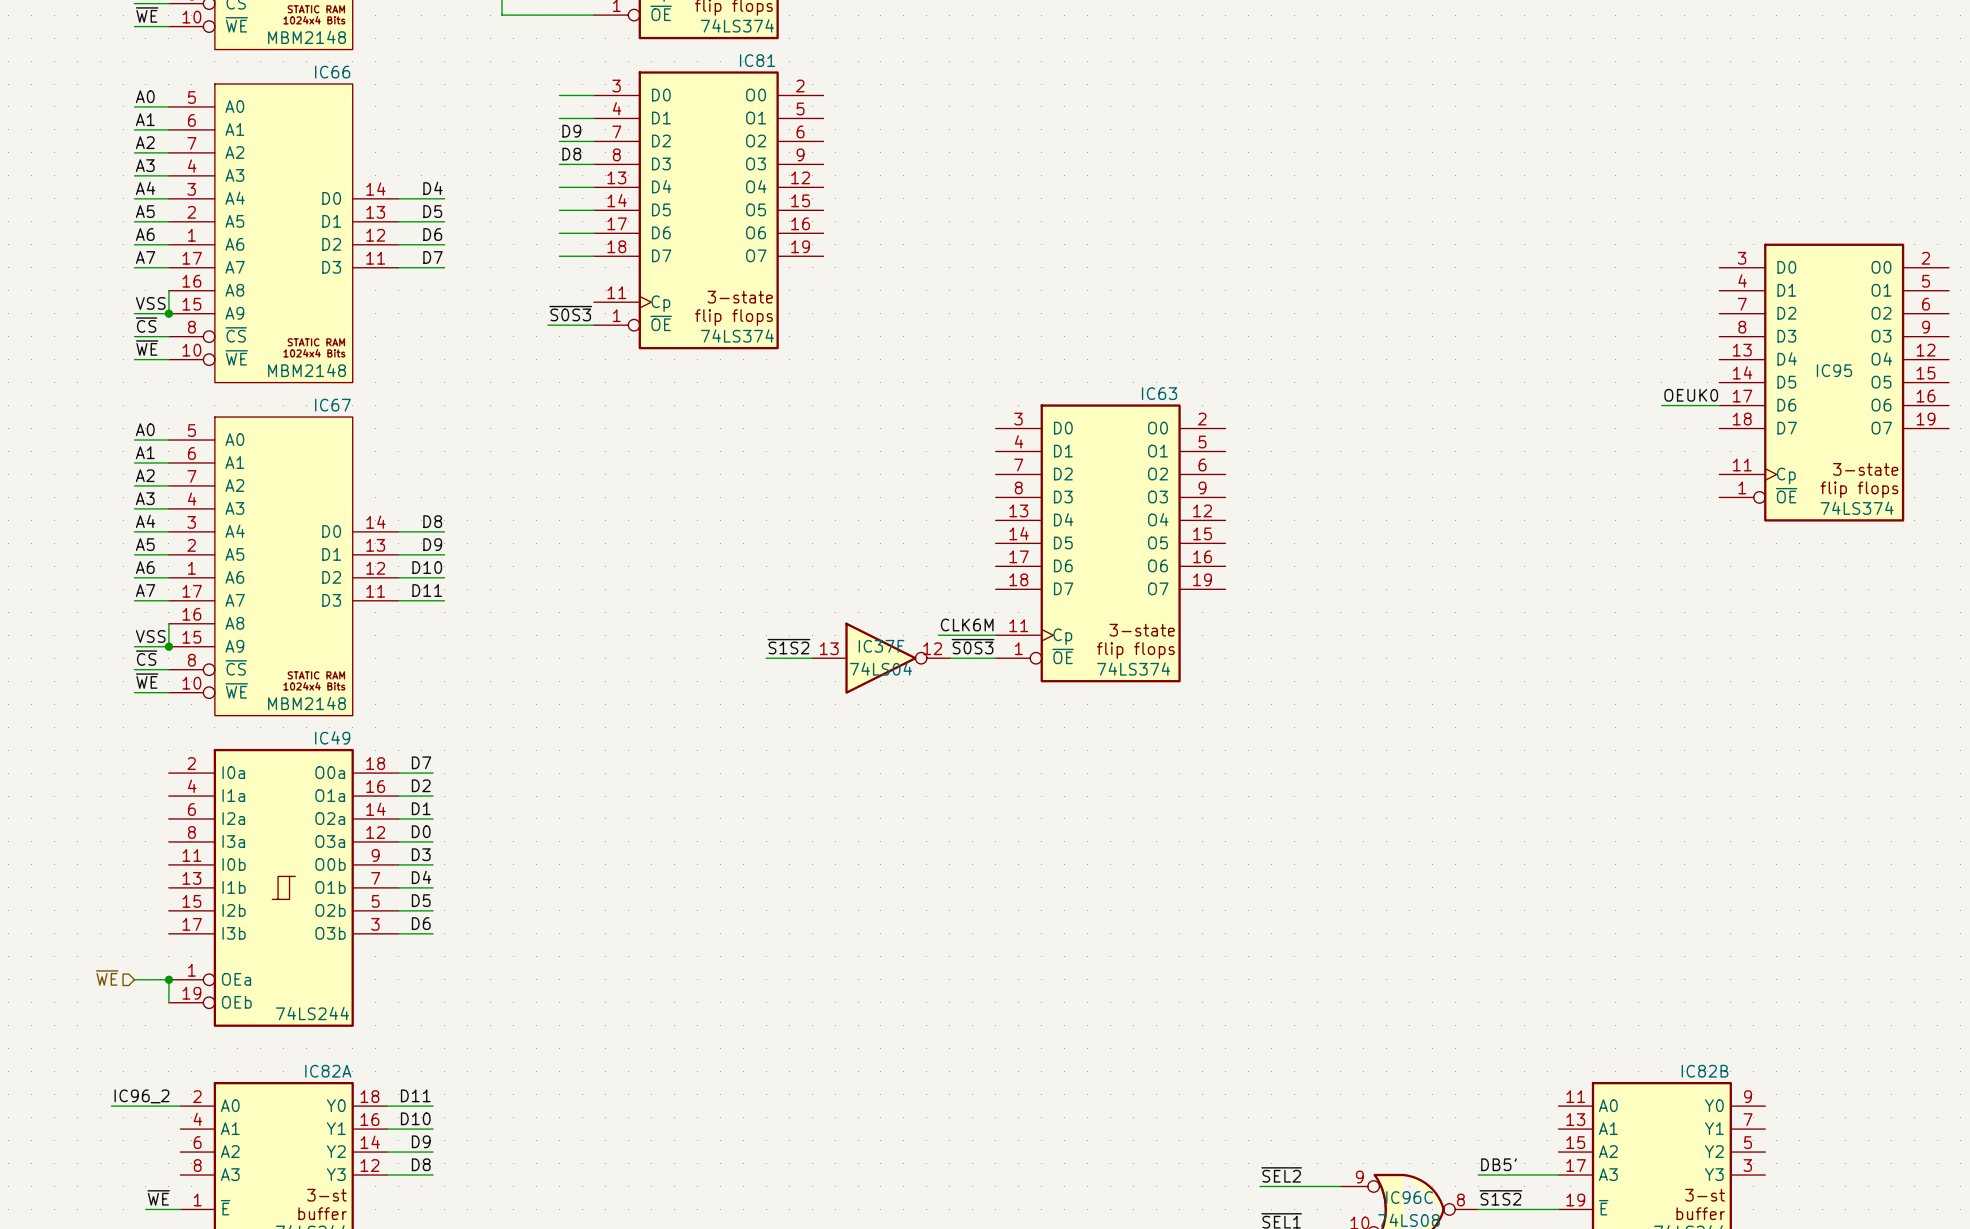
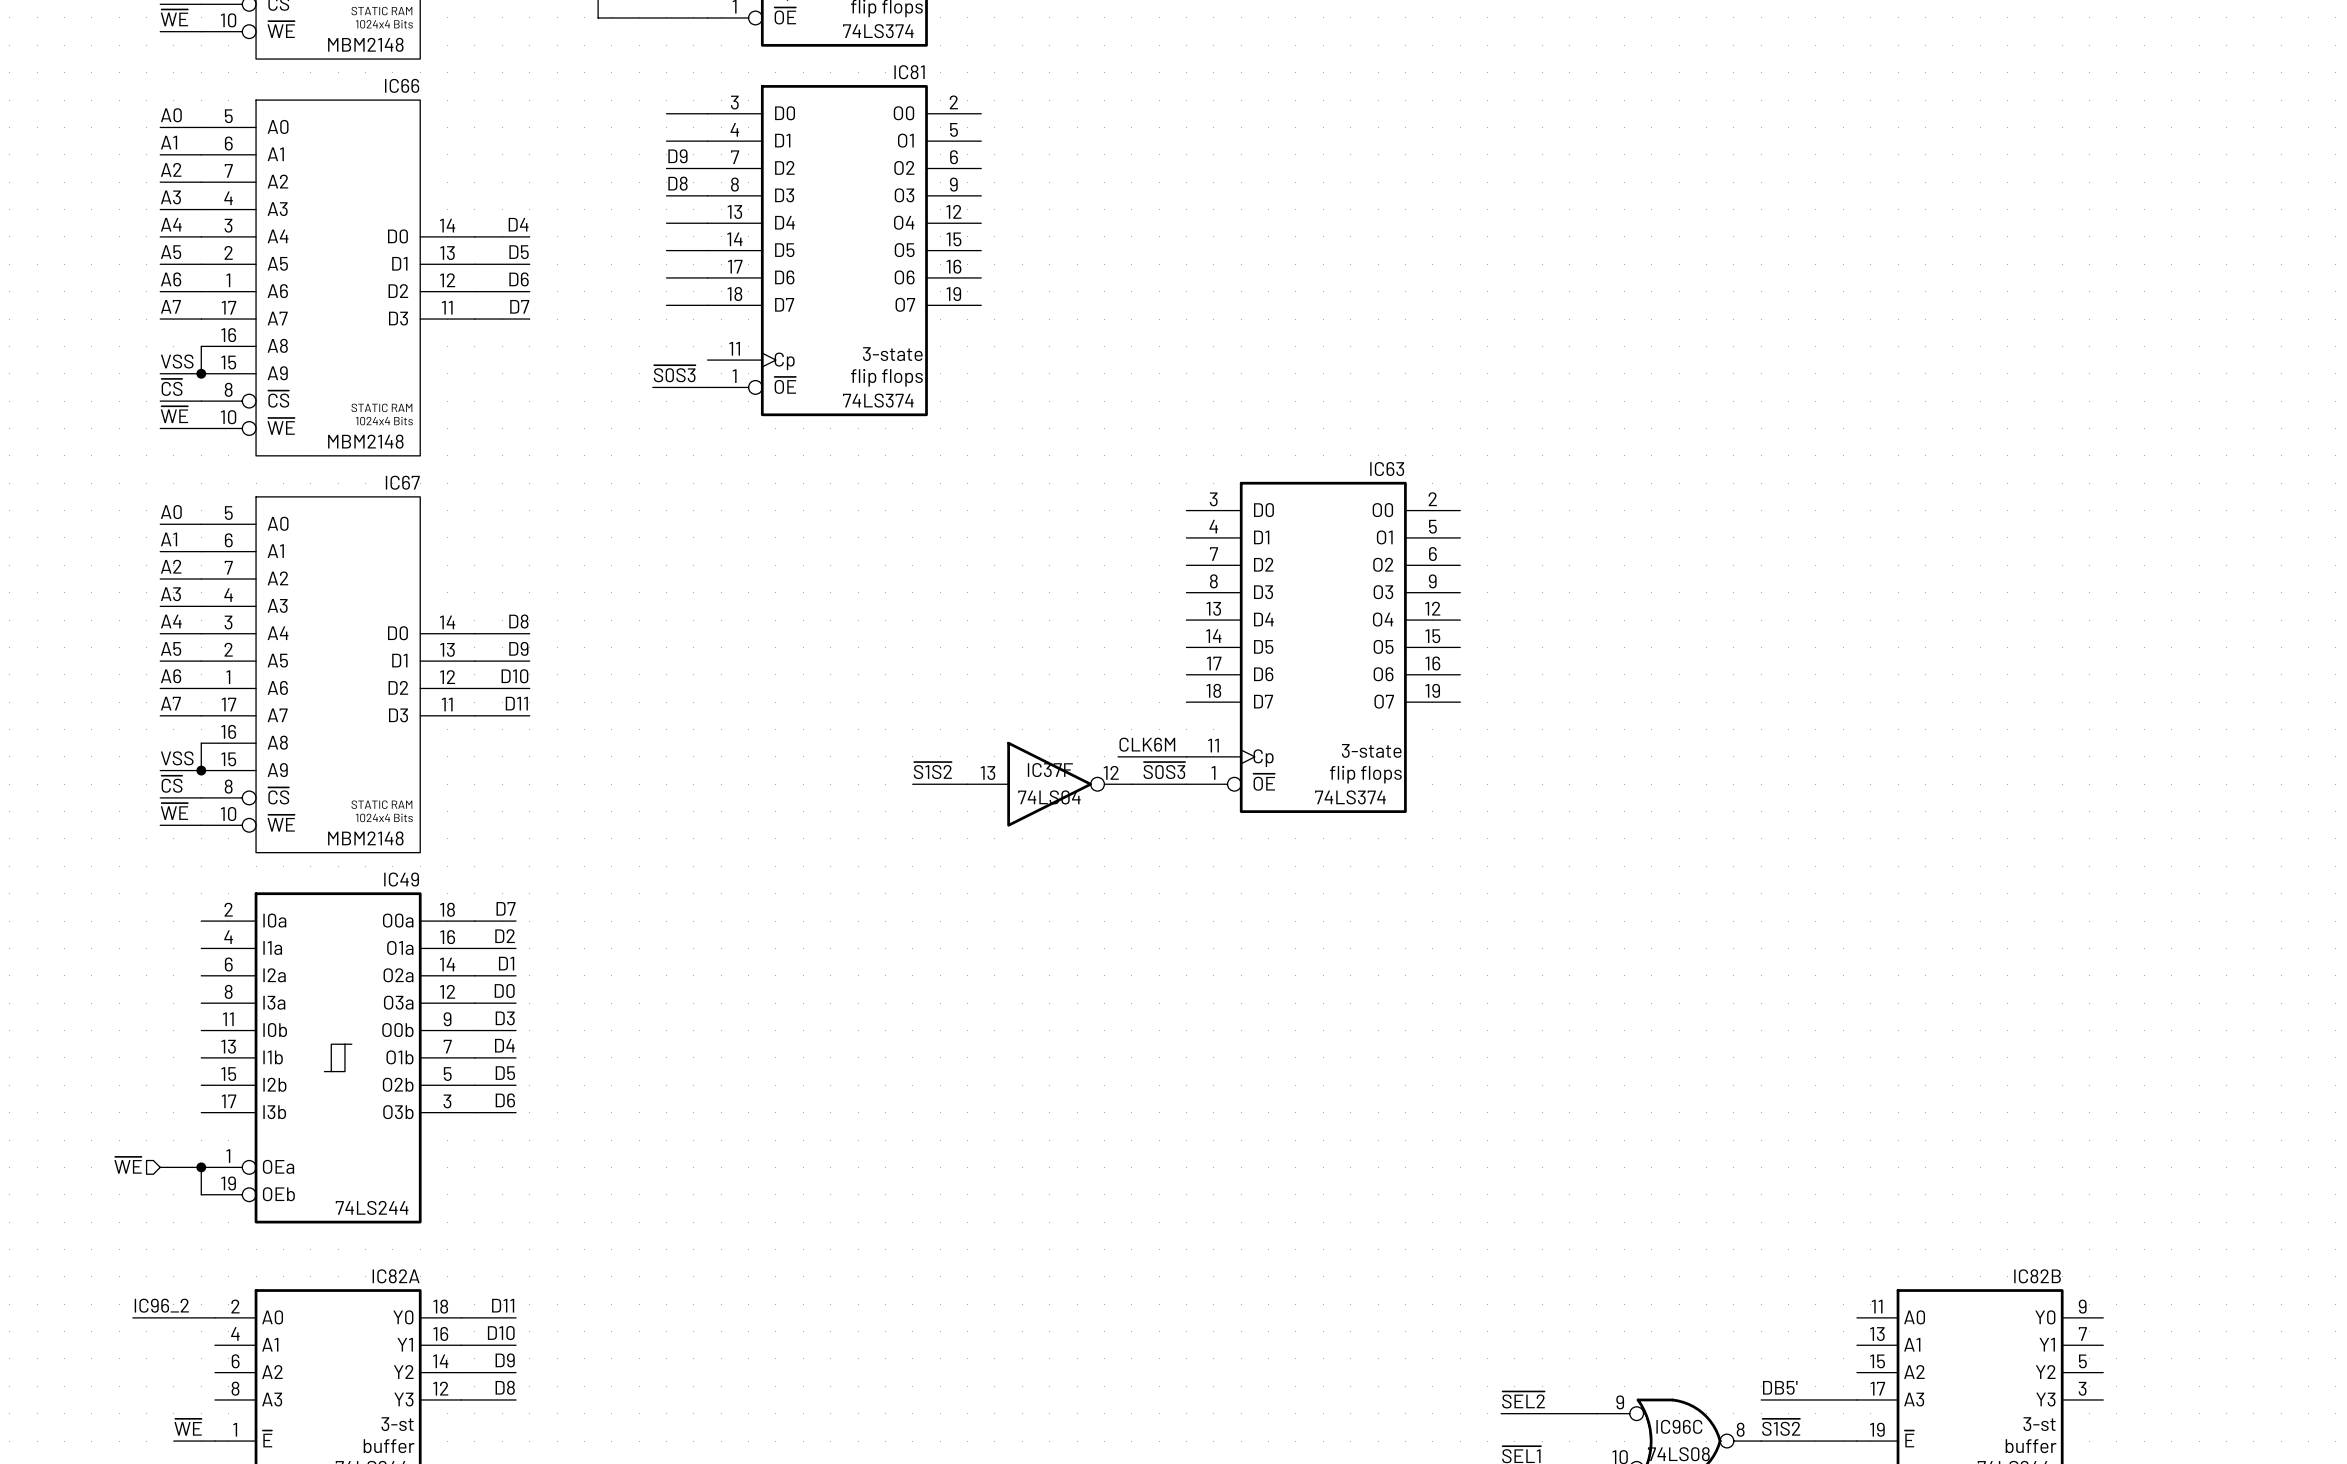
IC95: 74LS374 (1834, 382) -> none
label: OEUK0 (1691, 395) -> none
wire: (1661, 405) (1719, 405) -> none

